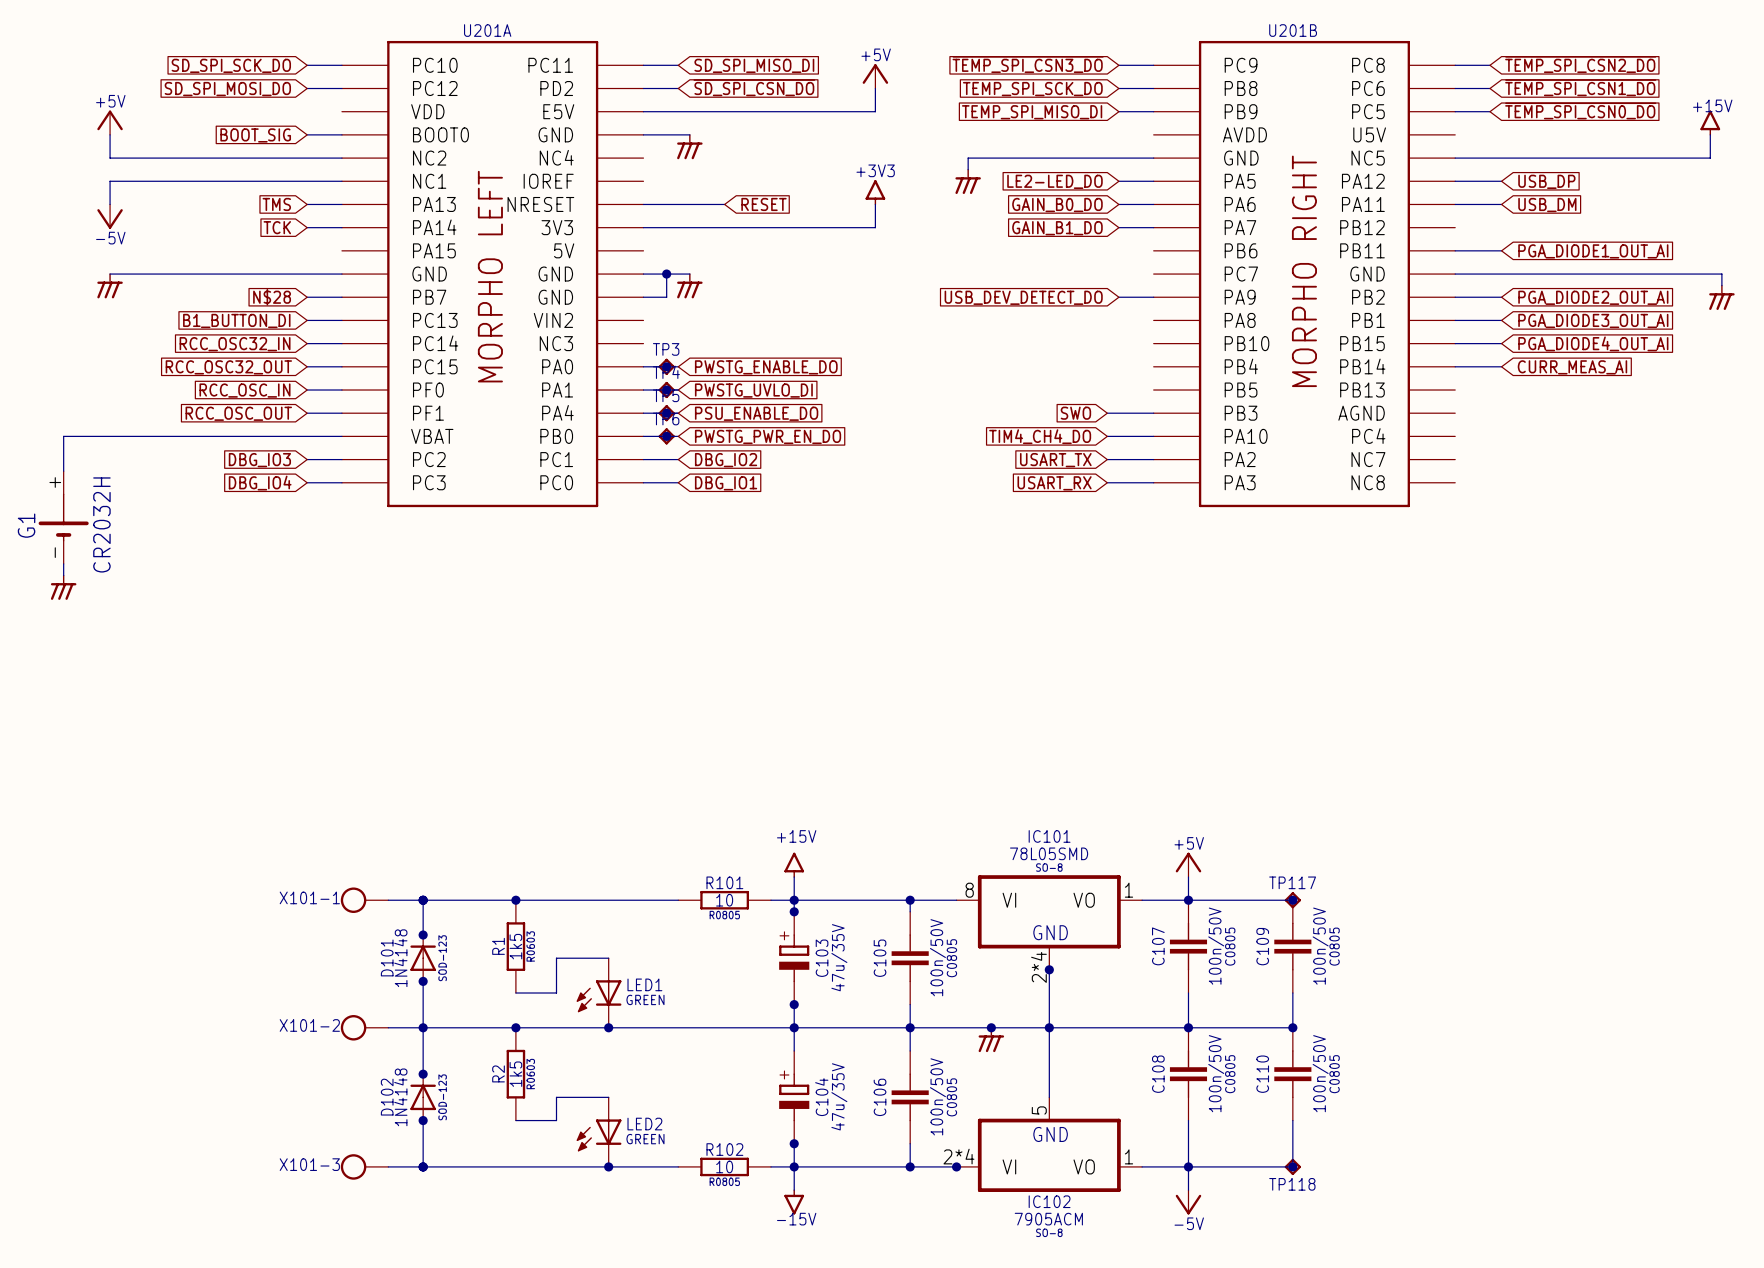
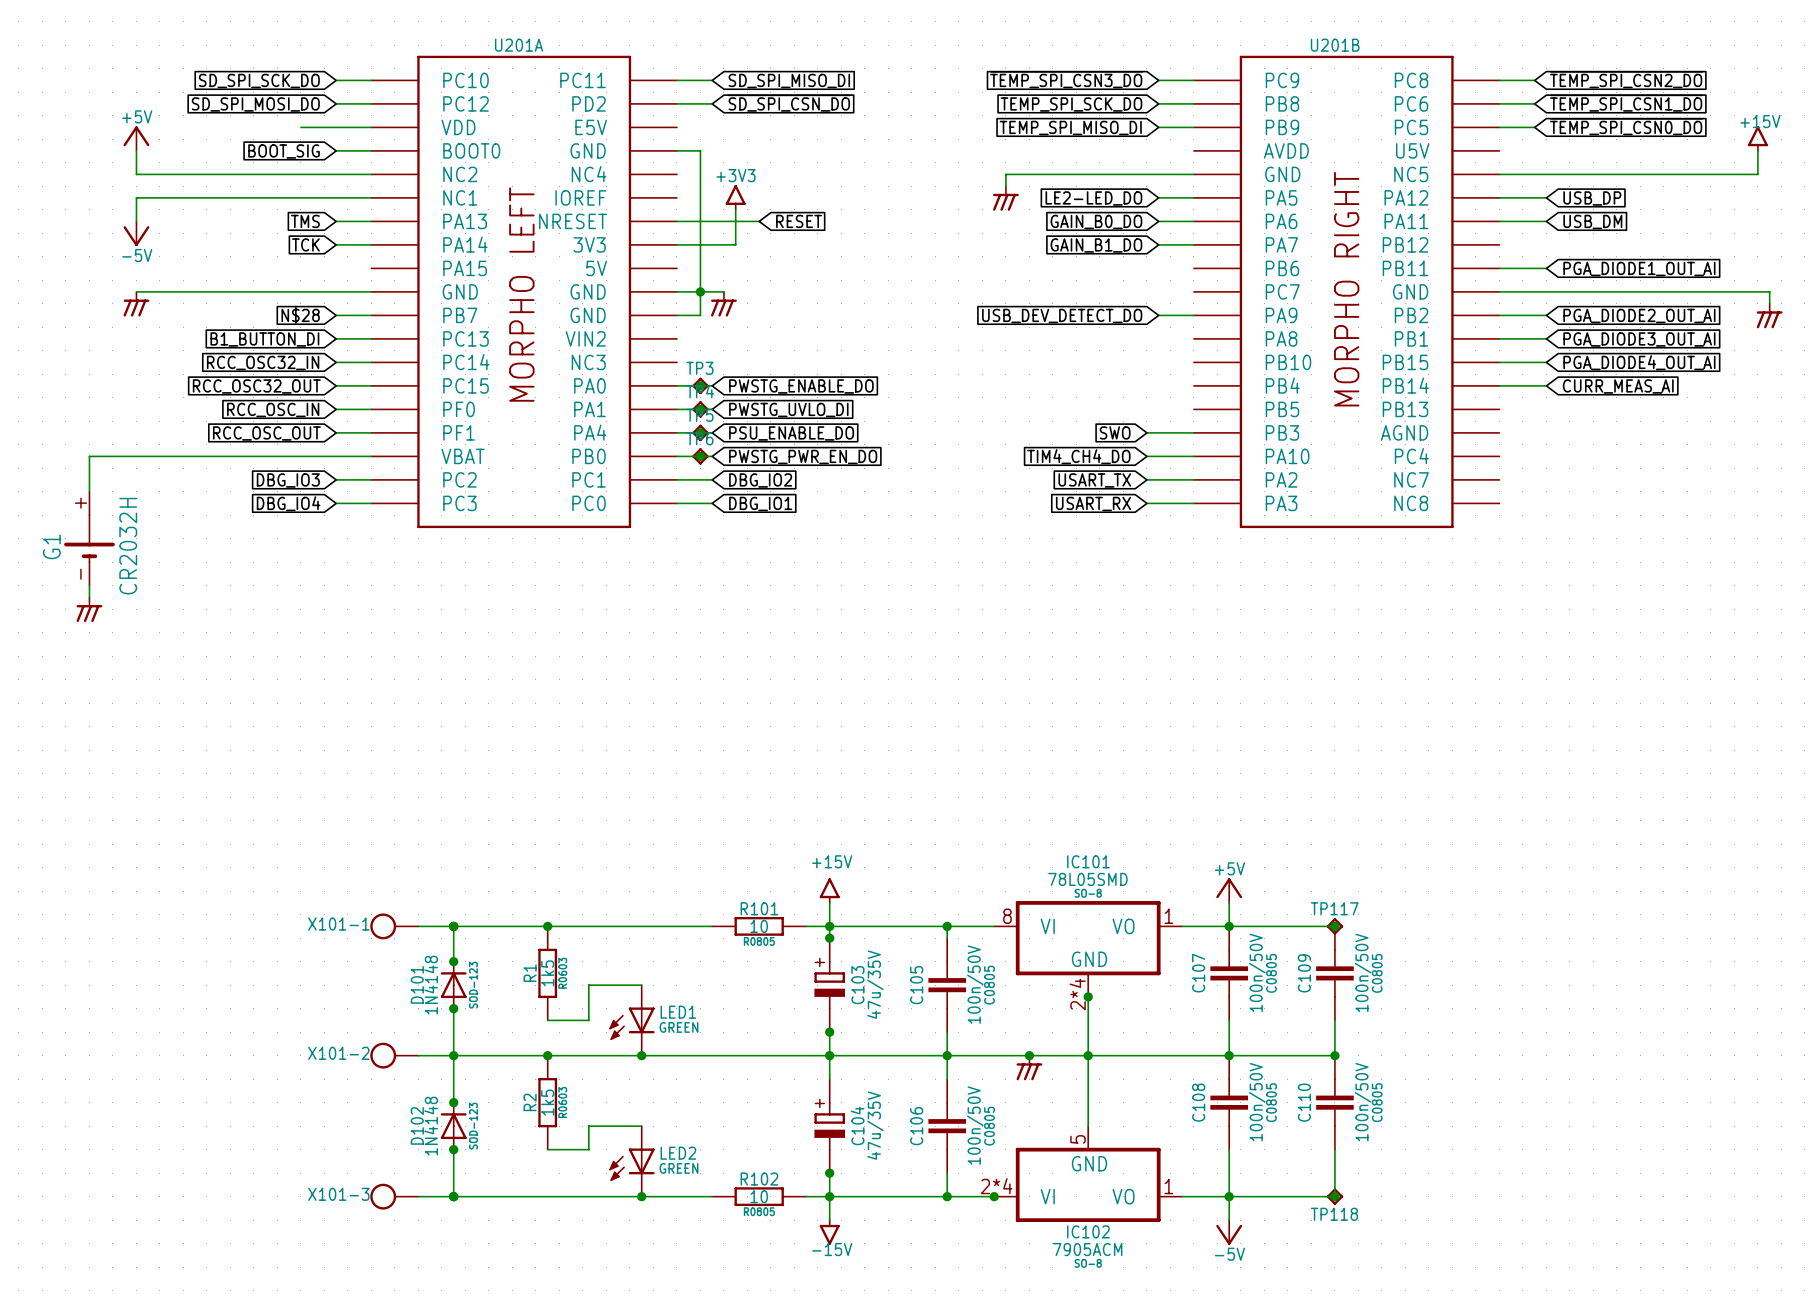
power symbol: +5V (875, 76) -> none
wire: (875, 88) (875, 111) (643, 111) -> none
wire: none -> (300, 127) (371, 127)
wire: (666, 134) (689, 134) -> (700, 150) (700, 291)
power symbol: (689, 146) -> none
power symbol position: +3V3 (875, 192) -> +3V3 (735, 197)
wire: (875, 204) (875, 227) (701, 227) -> (735, 209) (735, 244)

